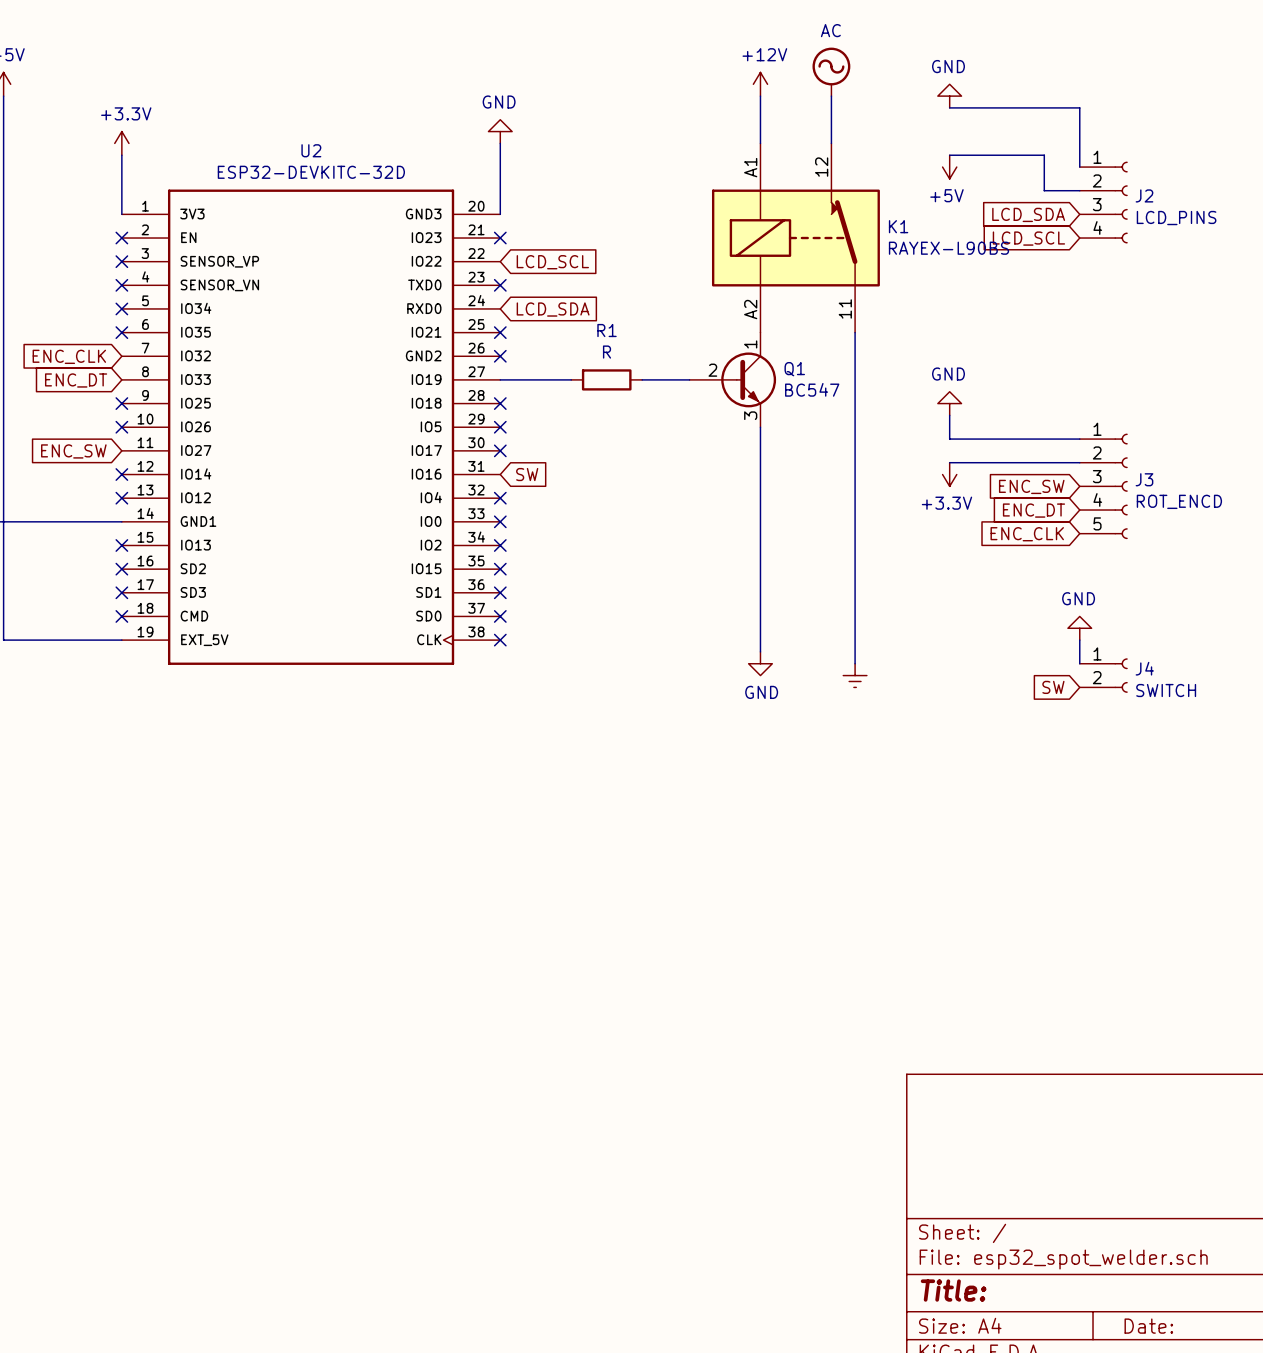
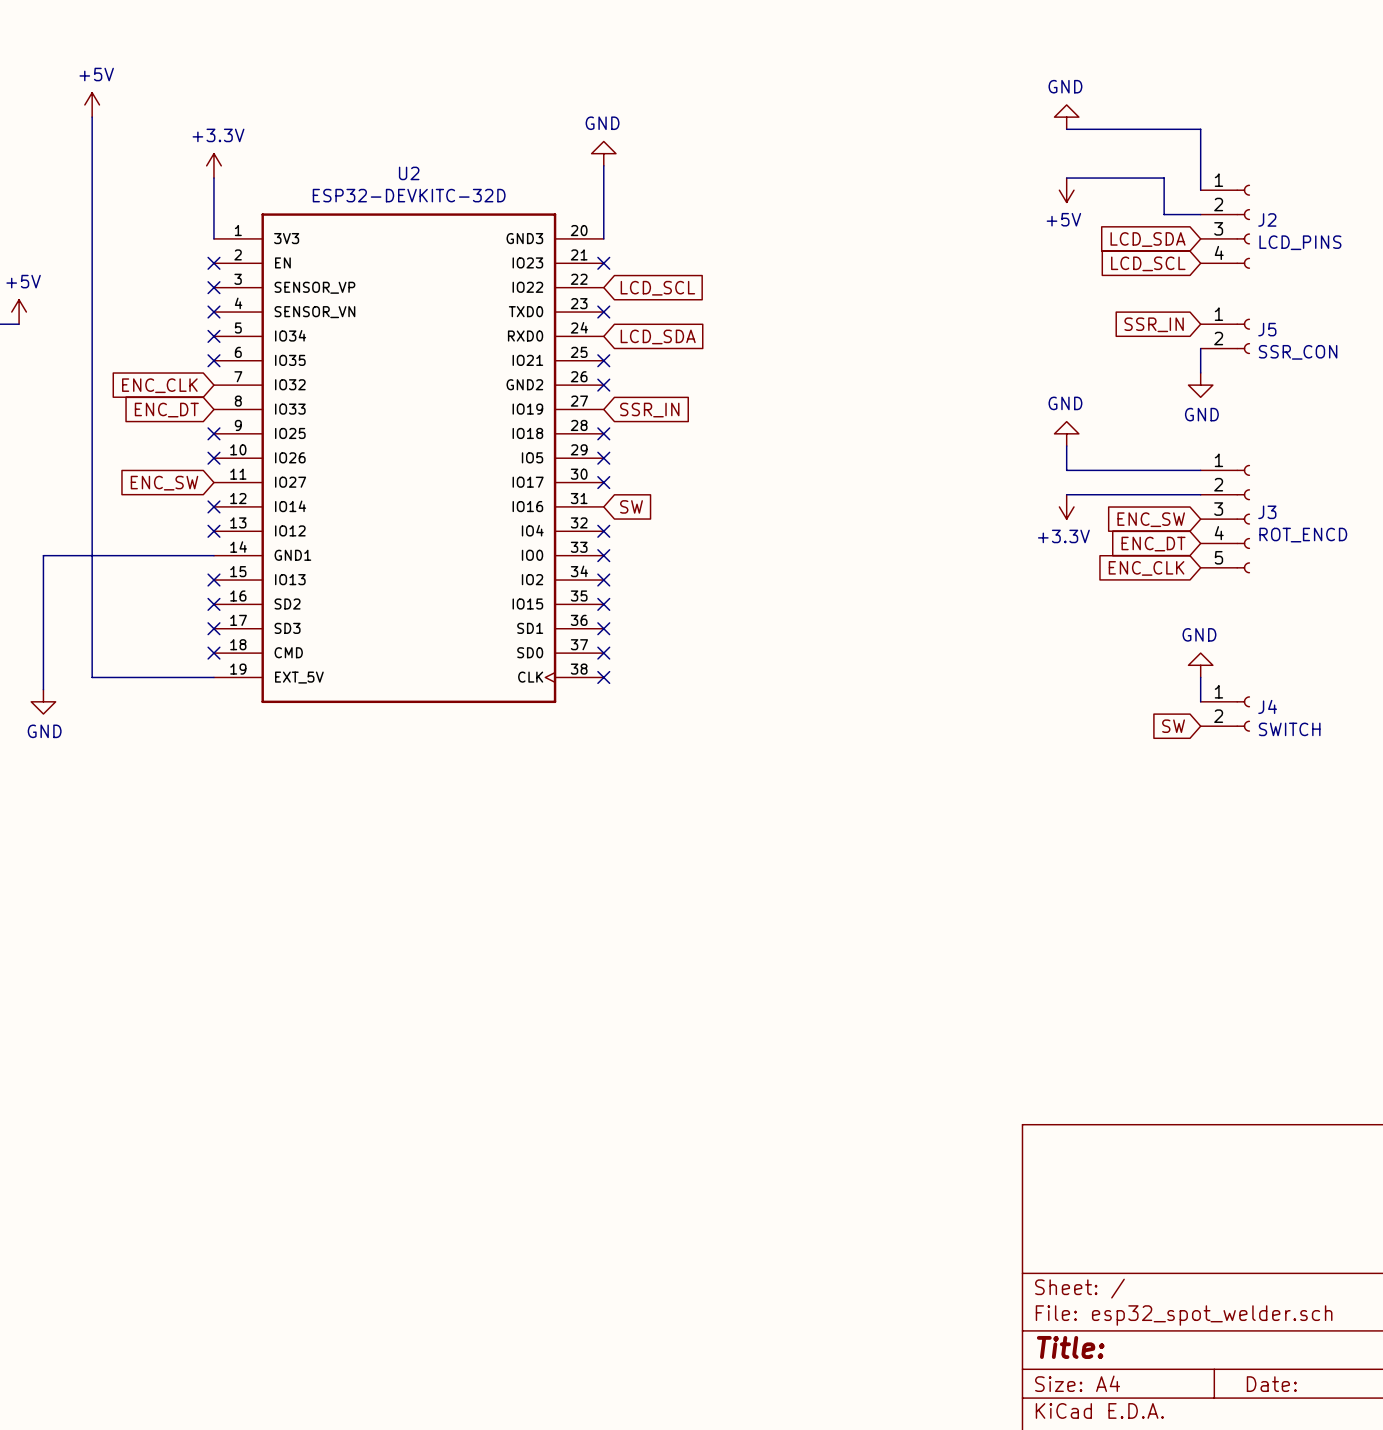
power symbol: AC (831, 71) -> none
power symbol: +12V (760, 84) -> none
wire: (760, 96) (760, 143) -> none
wire: (831, 96) (831, 143) -> none
K1: RAYEX-L90BS (795, 238) -> none
global label: none -> SSR_IN (1154, 324)
J5: none -> SSR_CON (1225, 336)
wire: none -> (1200, 348) (1200, 372)
wire: (855, 332) (855, 663) -> none
power symbol: none -> GND (1200, 385)
wire: (500, 379) (571, 379) -> none
R1: R (606, 379) -> none
wire: (642, 379) (689, 379) -> none
Q1: BC547 (732, 379) -> none
global label: none -> SSR_IN (649, 410)
wire: (760, 427) (760, 651) -> none
power symbol: GND (760, 663) -> none
power symbol: (855, 675) -> none

